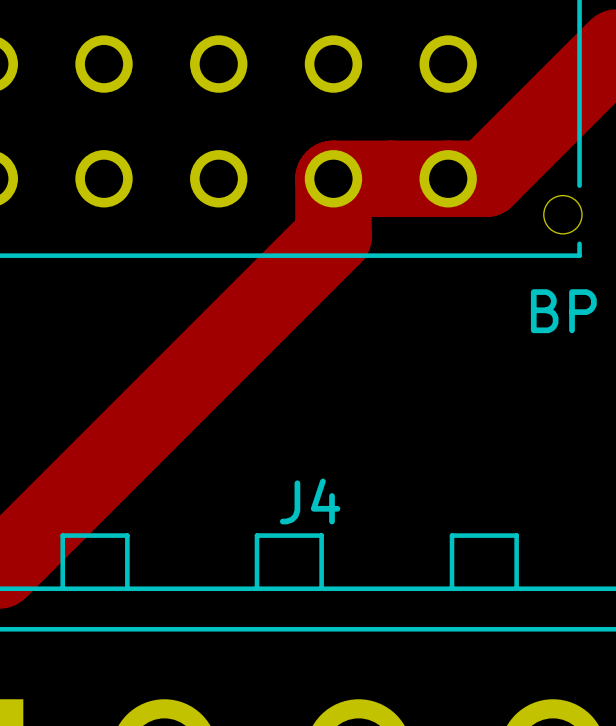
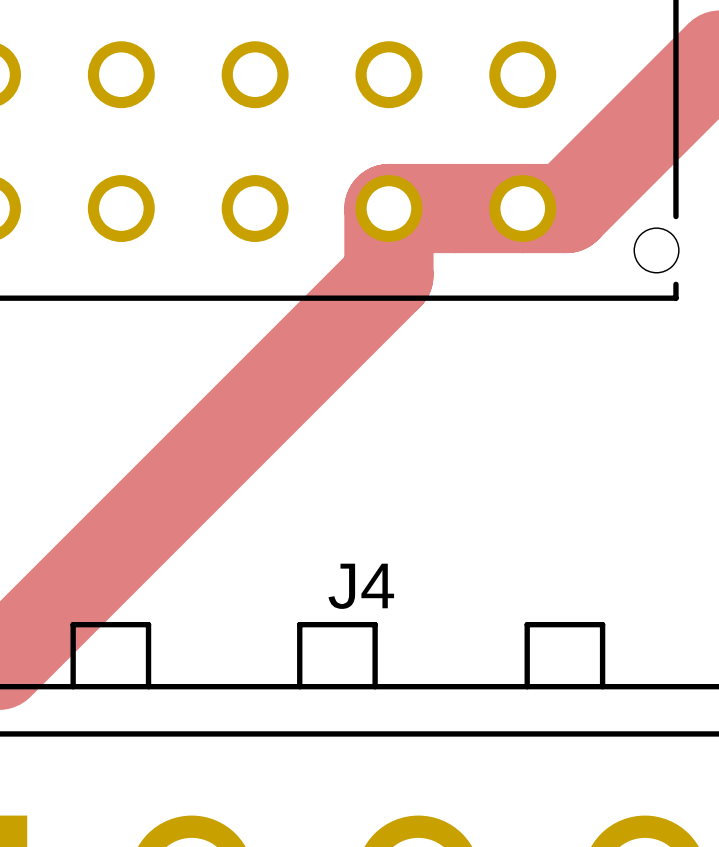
text: BP (563, 311) -> none

